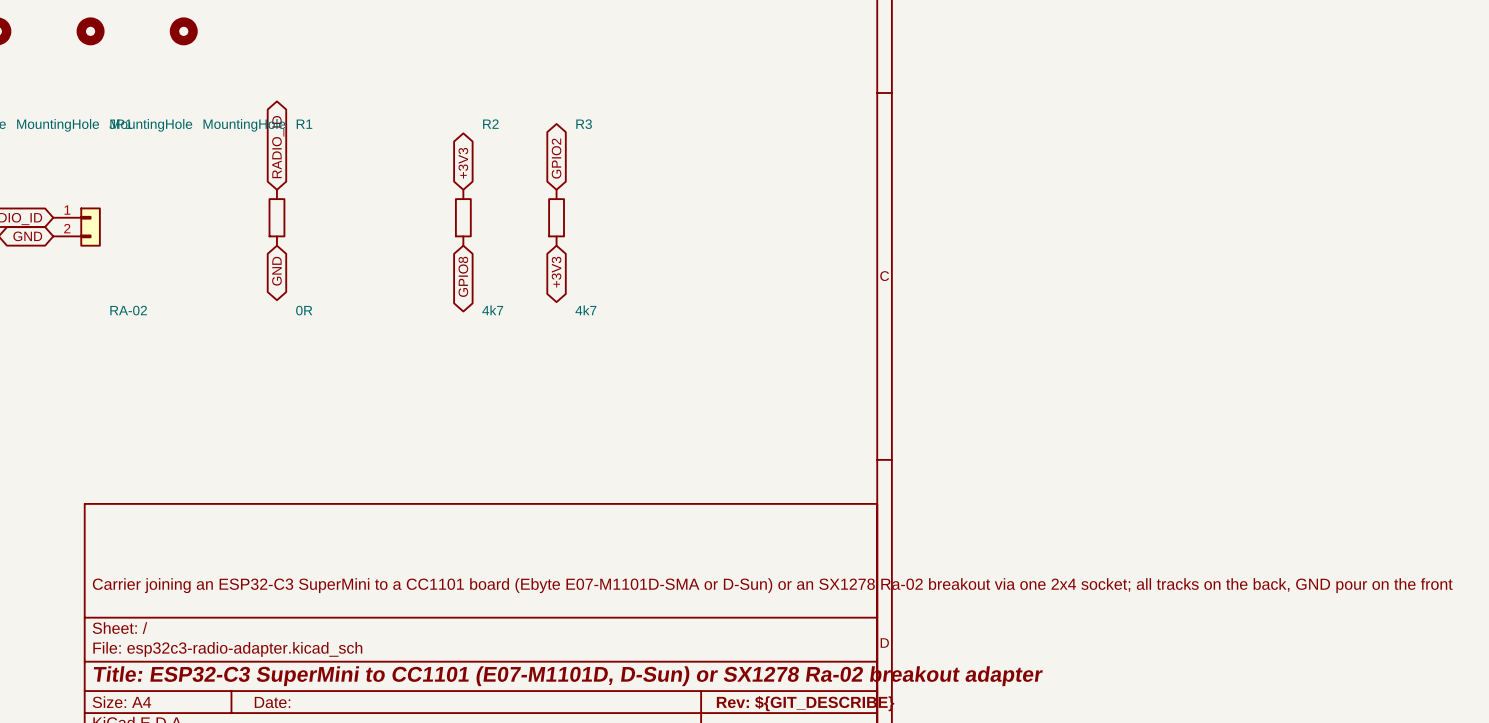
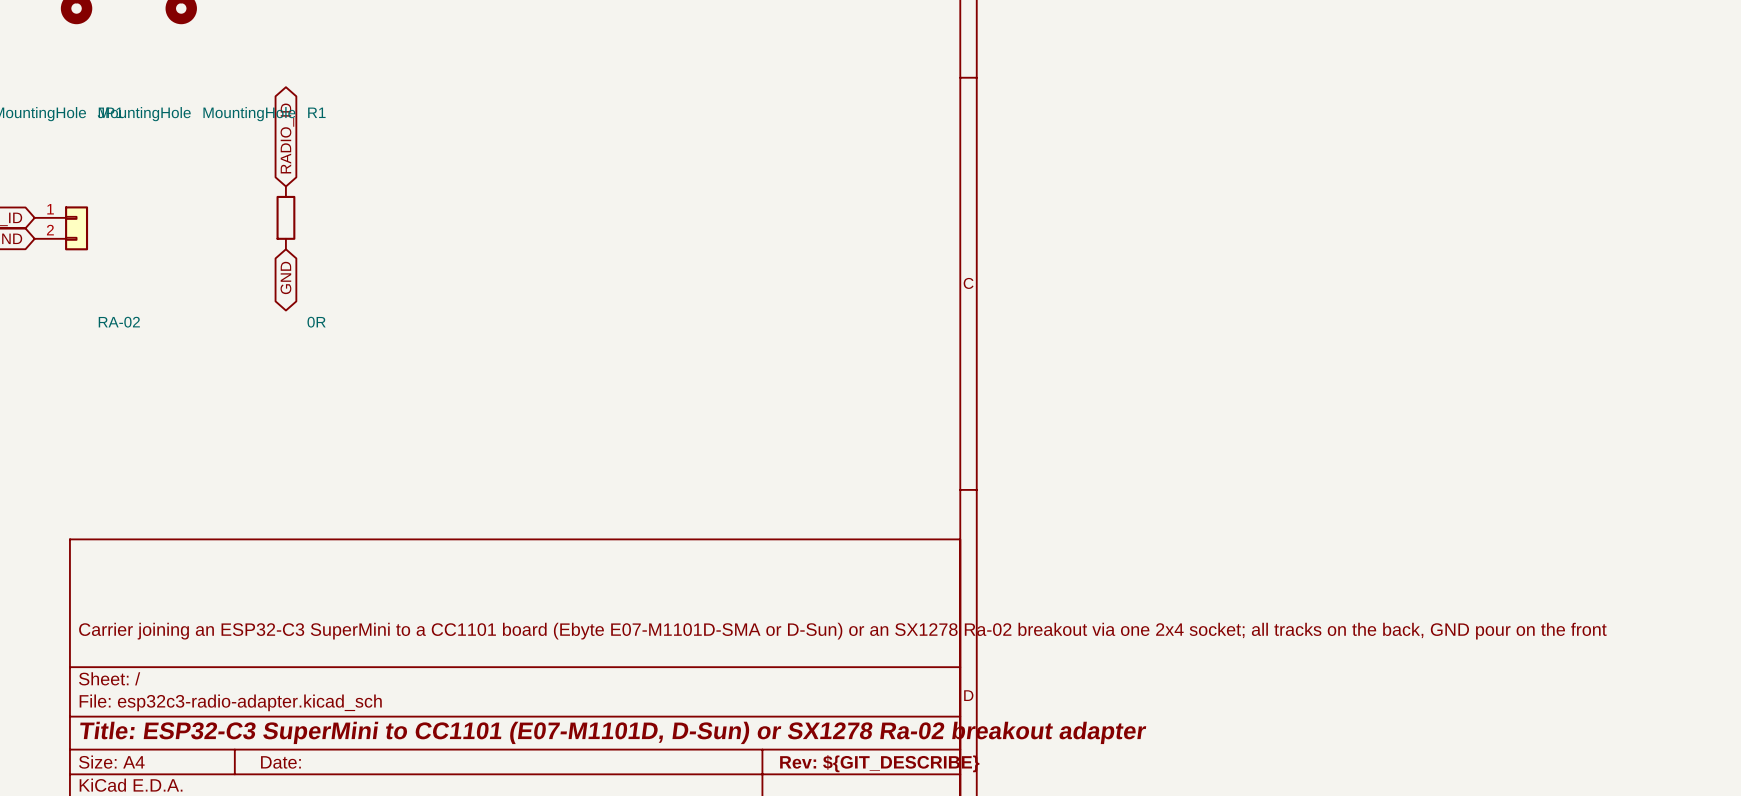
global label: GPIO2 (556, 158) -> none
global label: +3V3 (463, 163) -> none
R2: 4k7 (463, 217) -> none
R3: 4k7 (556, 217) -> none
global label: +3V3 (556, 272) -> none
global label: GPIO8 (463, 276) -> none

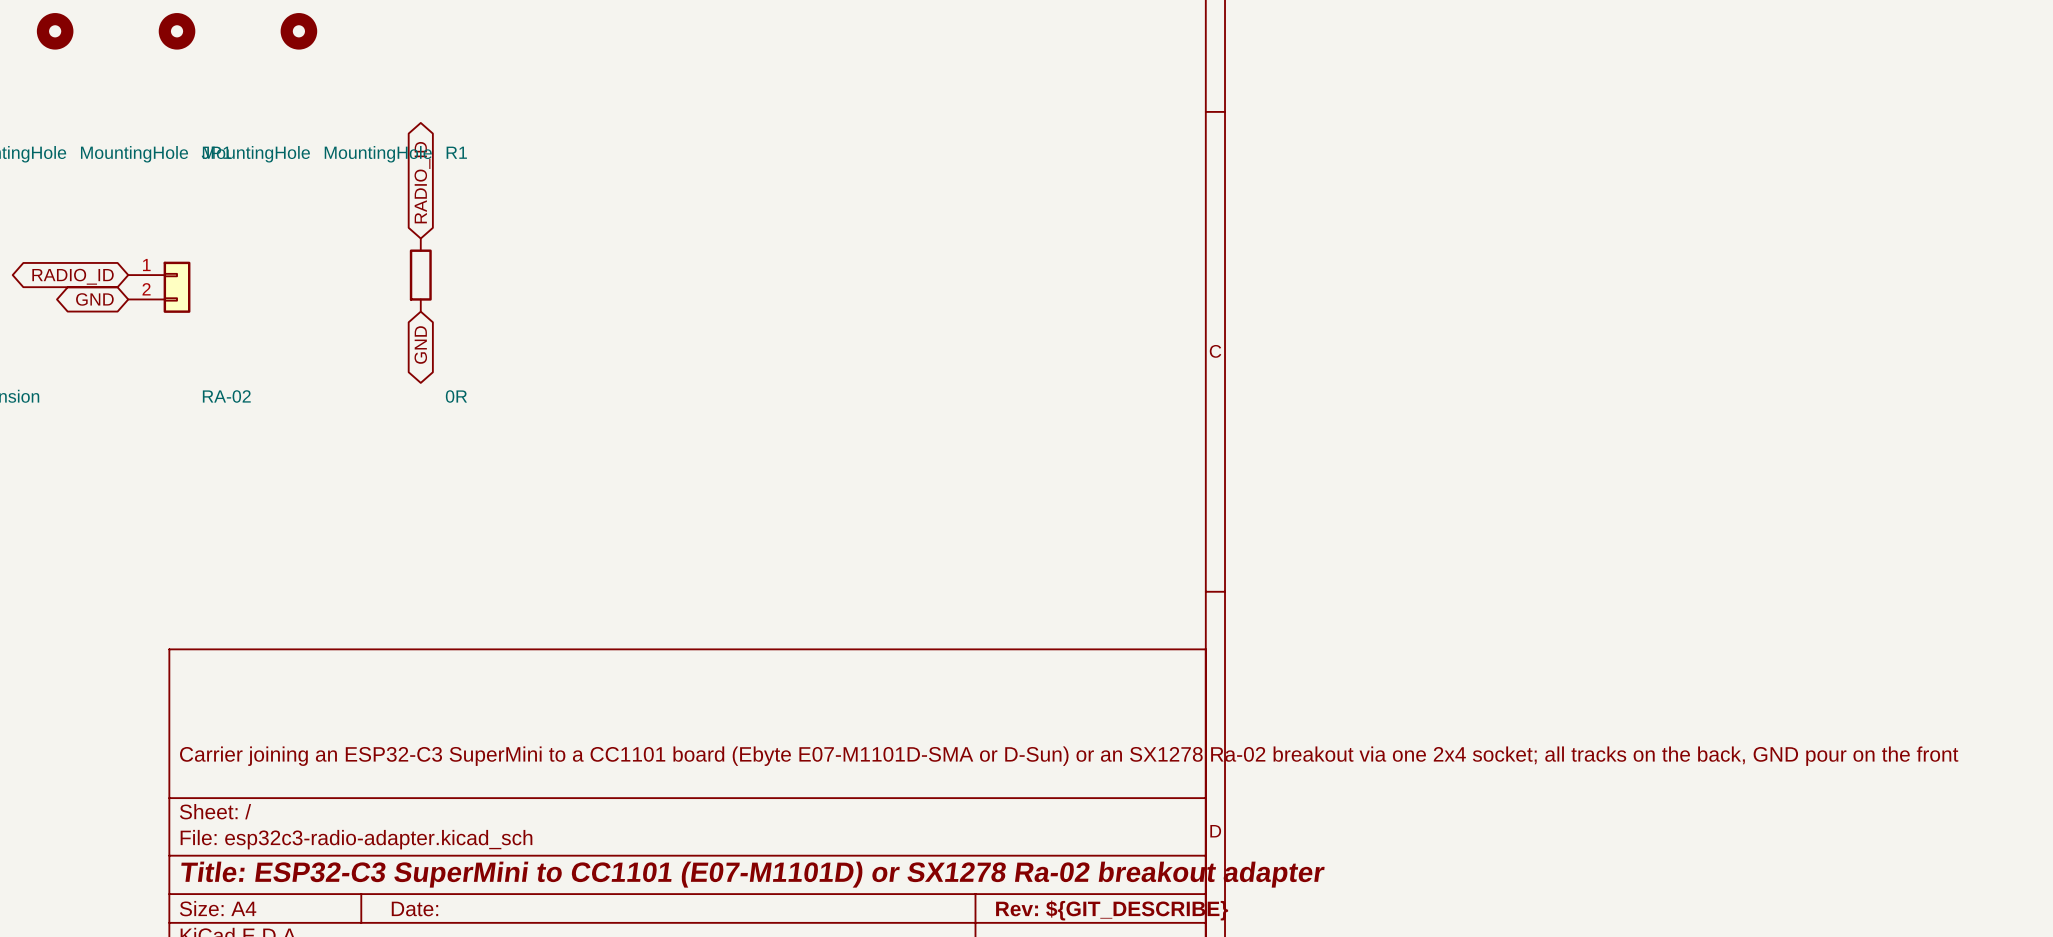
title block: Title: ESP32-C3 SuperMini to CC1101 (E07-M1101D, D-Sun) or SX1278 Ra-02 breakout adapter (613, 732) -> Title: ESP32-C3 SuperMini to CC1101 (E07-M1101D) or SX1278 Ra-02 breakout adapter (752, 874)

